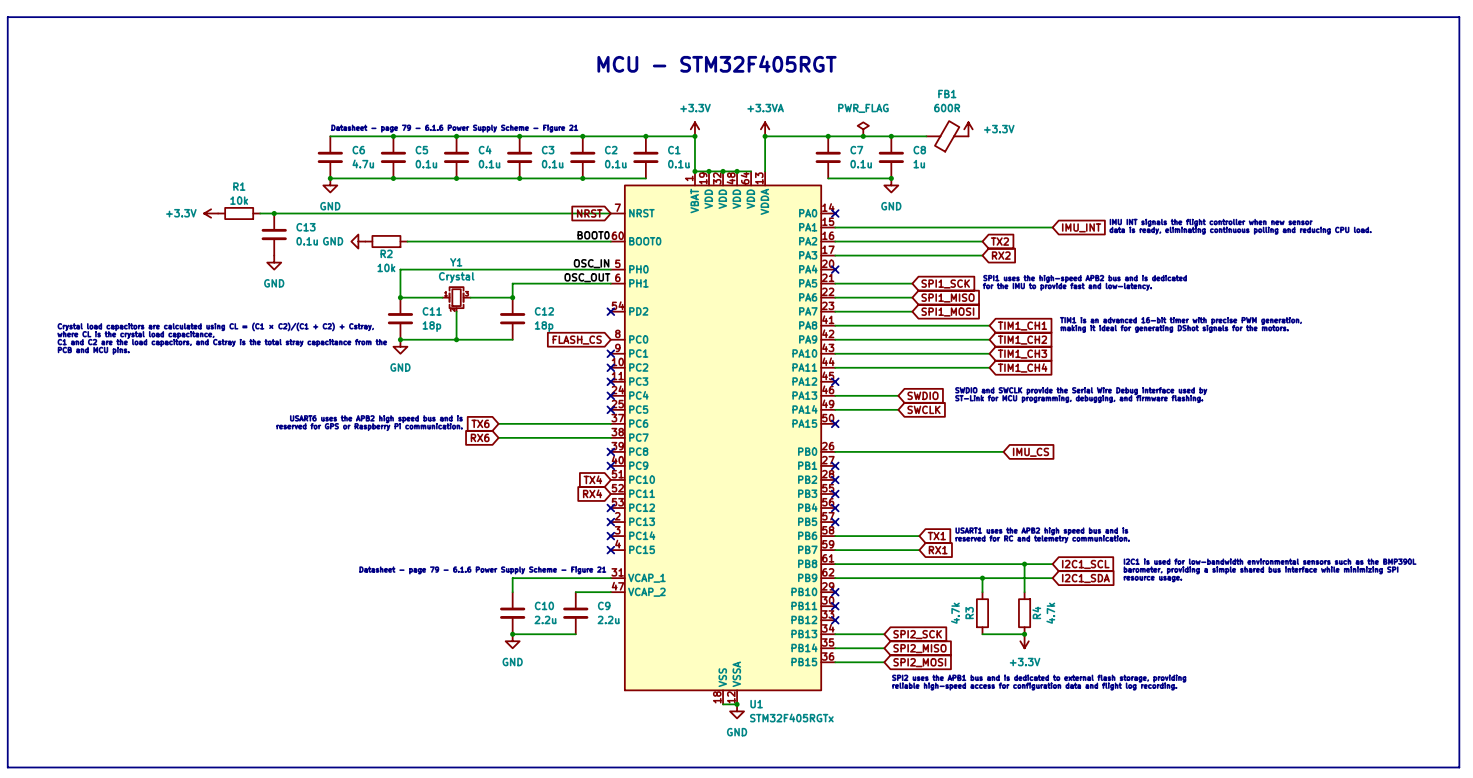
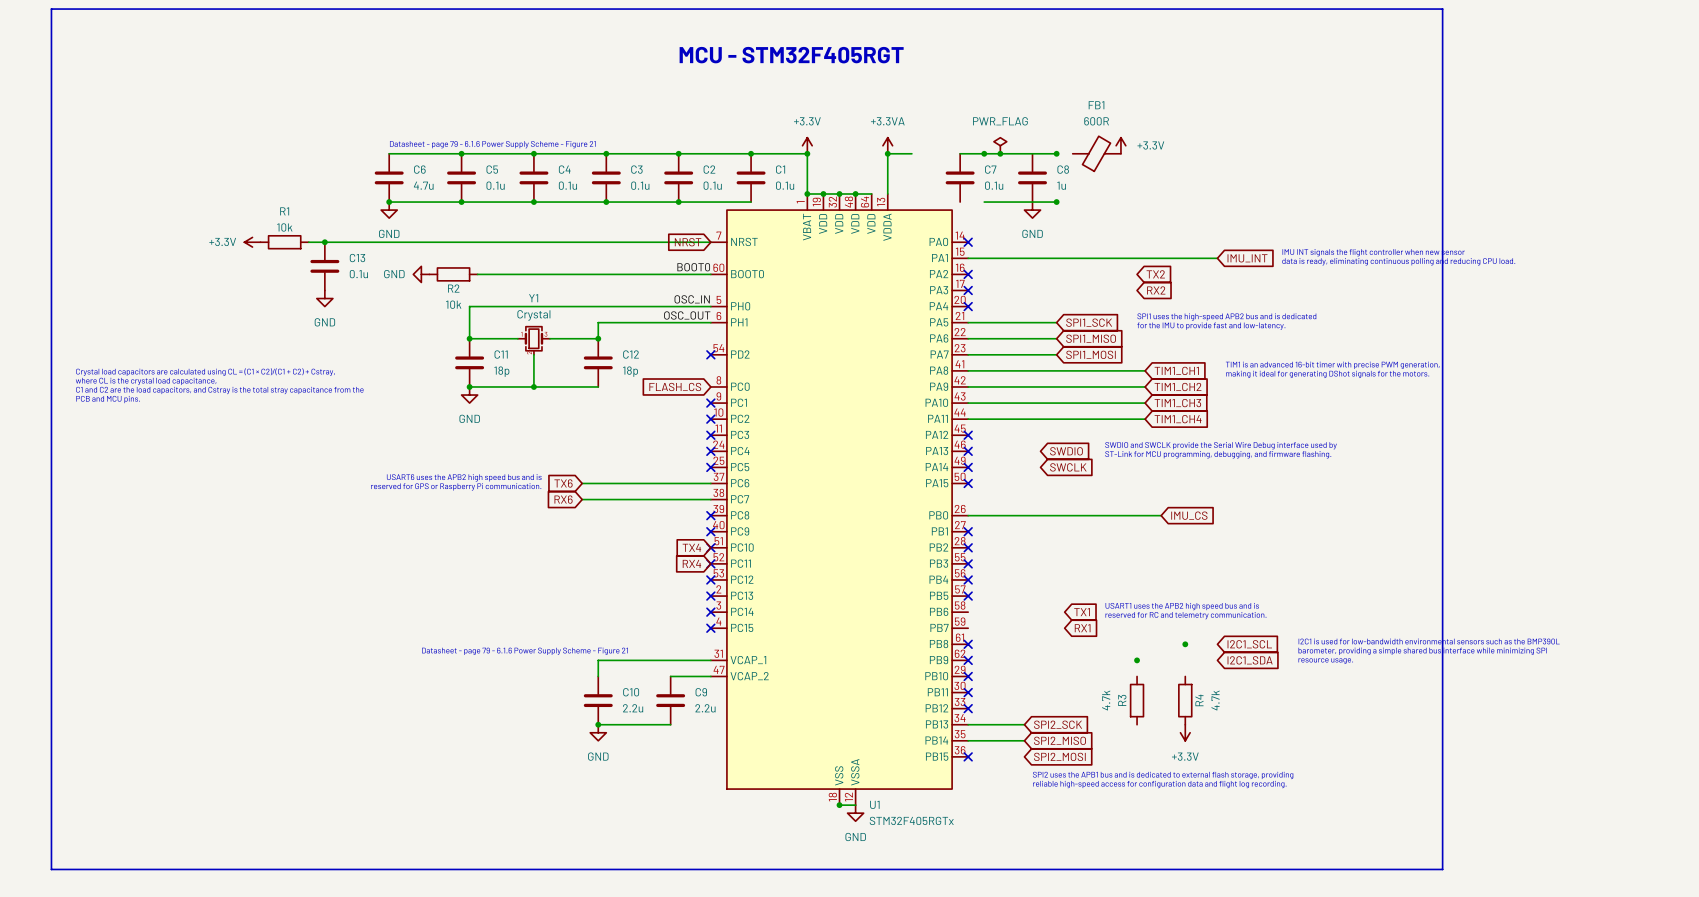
line: (7, 17) (1459, 17) (1459, 767) (7, 767) (7, 17) -> (51, 9) (51, 869) (1442, 869) (1442, 9) (51, 9)
text position: MCU - STM32F405RGT (717, 63) -> MCU - STM32F405RGT (791, 55)
wire: (786, 136) (828, 136) -> none
junction: (828, 136) -> none
junction: none -> (984, 153)
junction: (891, 136) -> none
wire: (912, 136) (926, 136) -> none
junction: none -> (1056, 153)
wire: (828, 178) (849, 178) -> (1032, 202) (1056, 202)
junction position: (891, 178) -> (1056, 202)
wire: (835, 241) (982, 241) -> none
no-connect mark: none -> (968, 274)
wire: (835, 255) (982, 255) -> none
no-connect mark: none -> (968, 290)
wire: (835, 395) (898, 395) -> none
no-connect mark: none -> (968, 451)
wire: (835, 409) (898, 409) -> none
no-connect mark: none -> (968, 467)
no-connect mark: none -> (710, 547)
no-connect mark: none -> (710, 563)
wire: (835, 536) (919, 536) -> none
wire: (835, 550) (919, 550) -> none
wire: (835, 564) (1052, 564) -> none
no-connect mark: none -> (968, 644)
wire: (1024, 564) (1024, 592) -> none
wire: (835, 578) (1052, 578) -> none
no-connect mark: none -> (968, 660)
wire: (982, 578) (982, 592) -> none
wire: (982, 634) (1024, 634) -> none
junction: (1024, 634) -> none
wire: (835, 662) (884, 662) -> none
no-connect mark: none -> (968, 756)
junction position: (737, 704) -> (839, 805)

